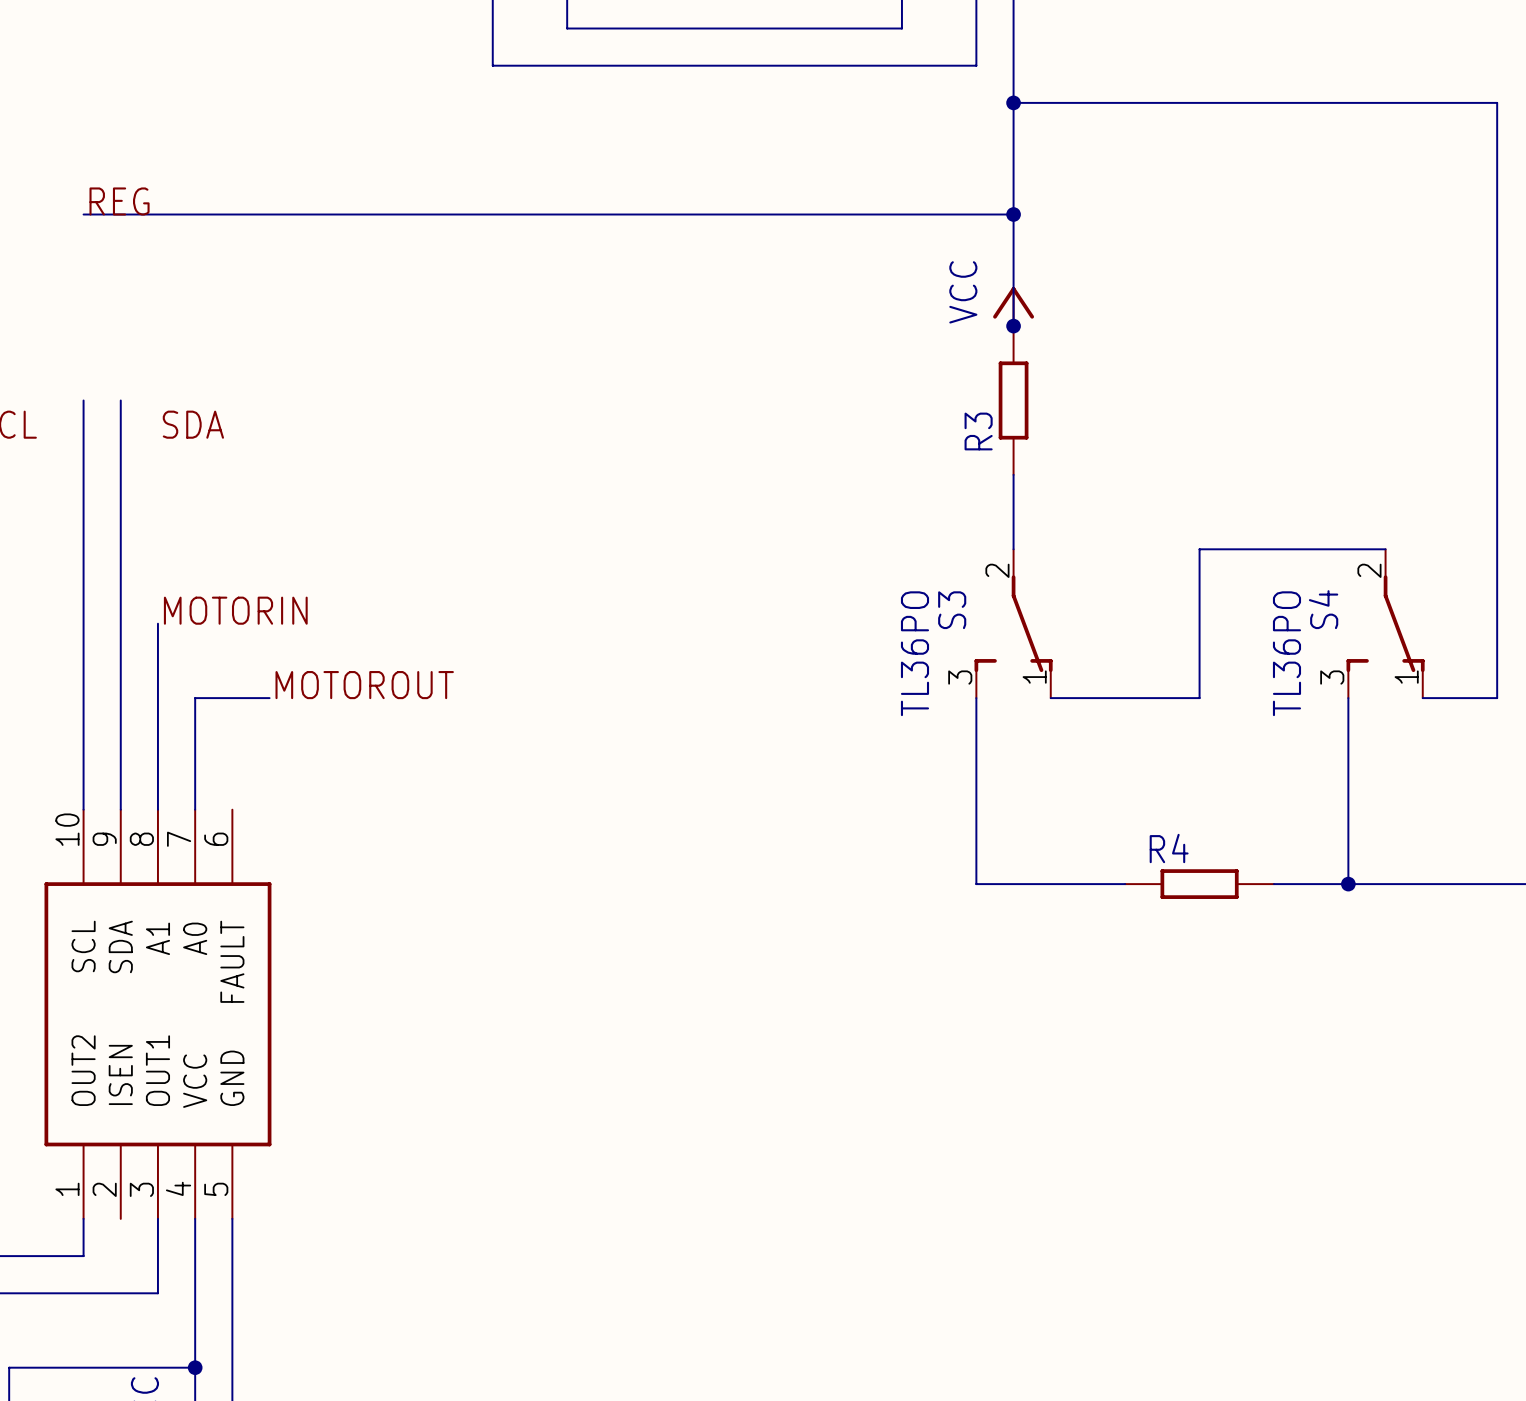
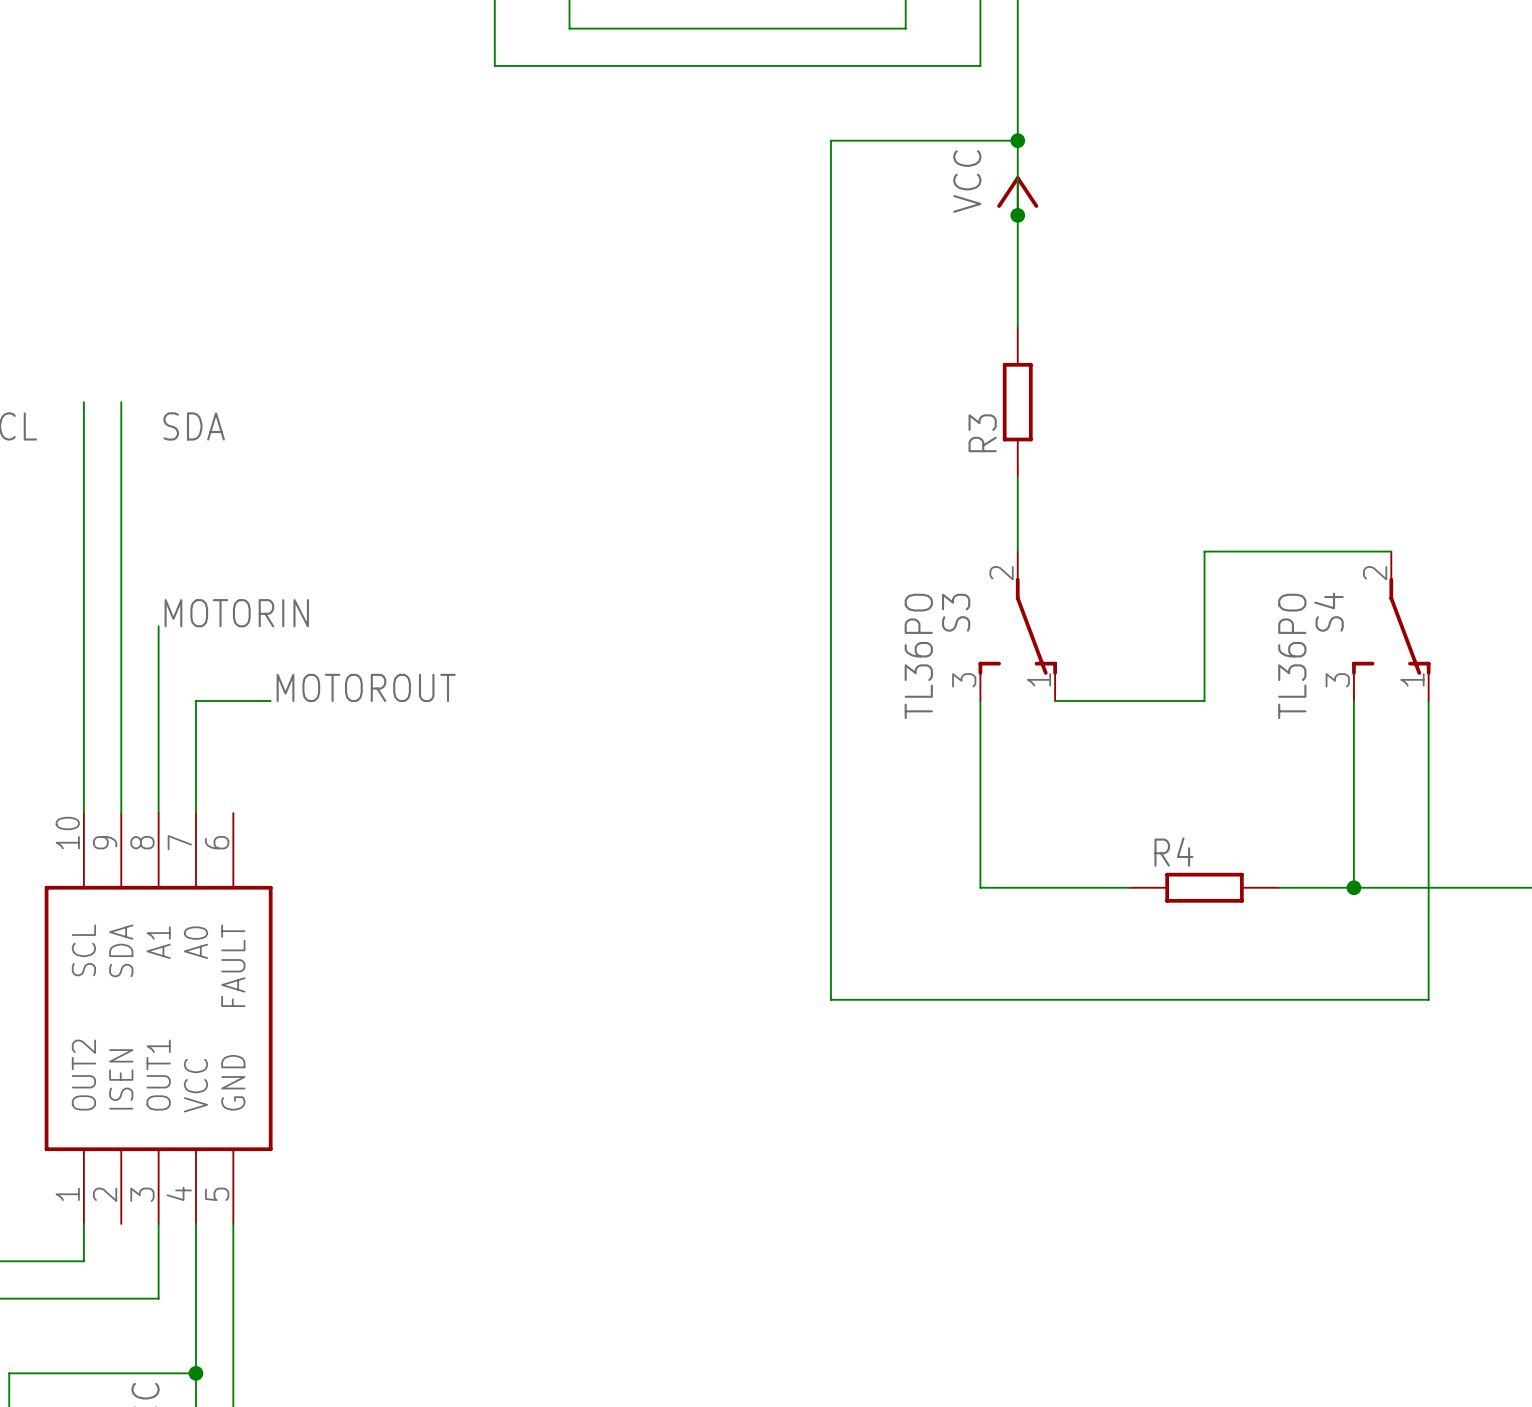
wire: (1013, 102) (1497, 102) (1497, 698) (1422, 698) -> (1017, 140) (830, 140) (830, 999) (1428, 999) (1428, 700)
junction position: (1013, 102) -> (1017, 140)
label: REG (119, 201) -> none
wire: (83, 214) (1013, 214) -> none
power symbol position: VCC (1013, 306) -> VCC (1017, 195)
junction: (1013, 326) -> none

